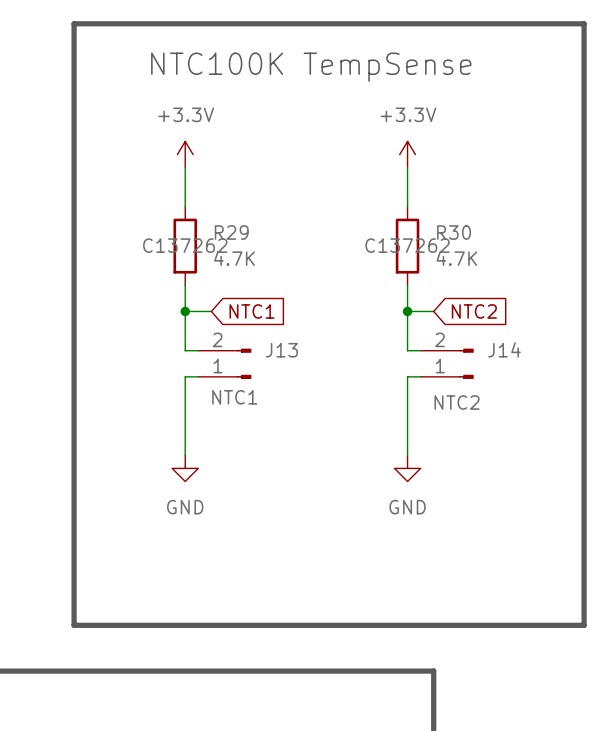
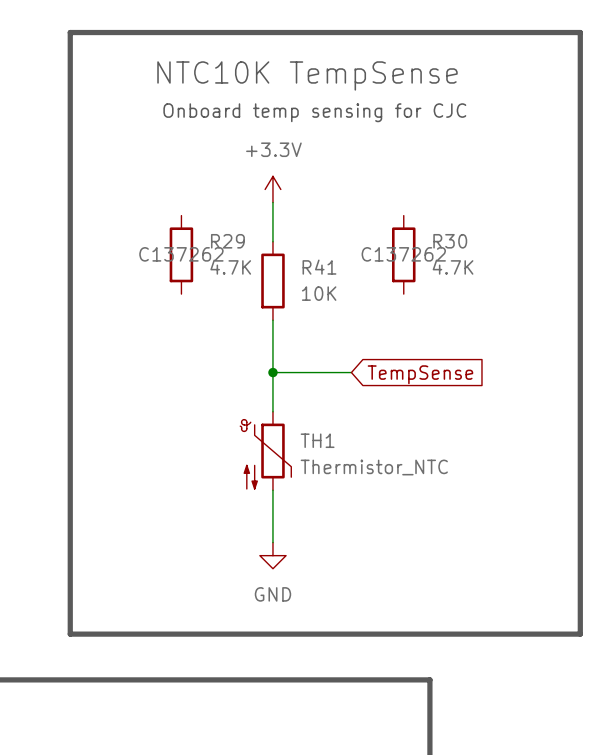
text: NTC100K TempSense (311, 67) -> NTC10K TempSense (307, 75)
text: none -> Onboard temp sensing for CJC (314, 112)
power symbol: +3.3V (185, 154) -> none
power symbol: +3.3V (407, 154) -> none
wire: (185, 167) (185, 206) -> (272, 202) (272, 241)
wire: (407, 167) (407, 206) -> none
power symbol: none -> +3.3V (272, 189)
R41: none -> 10K (272, 281)
wire: (185, 285) (185, 350) (198, 350) -> none
wire: (407, 285) (407, 350) (420, 350) -> none
wire: (185, 311) (211, 311) -> none
junction: (185, 311) -> none
global label: NTC1 (252, 311) -> none
wire: none -> (272, 320) (272, 411)
wire: (407, 311) (433, 311) -> none
junction: (407, 311) -> none
global label: NTC2 (474, 311) -> none
J13: NTC1 (224, 363) -> none
wire: none -> (272, 372) (351, 372)
junction: none -> (272, 372)
J14: NTC2 (447, 363) -> none
global label: none -> TempSense (420, 374)
wire: (198, 376) (185, 376) (185, 455) -> none
wire: (420, 376) (407, 376) (407, 455) -> none
TH1: none -> Thermistor_NTC (265, 451)
power symbol: GND (185, 468) -> none
power symbol: GND (407, 468) -> none
wire: none -> (272, 490) (272, 542)
power symbol: none -> GND (272, 555)

